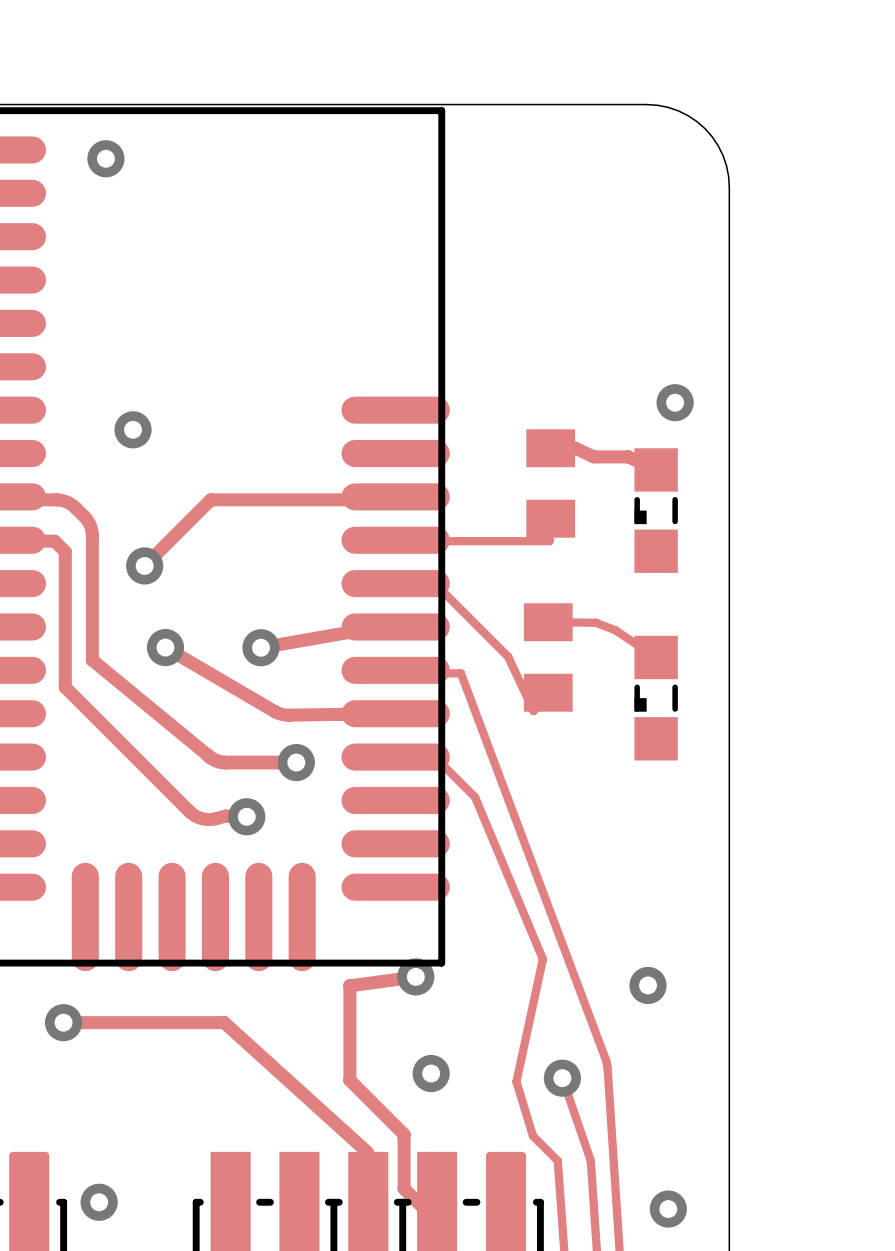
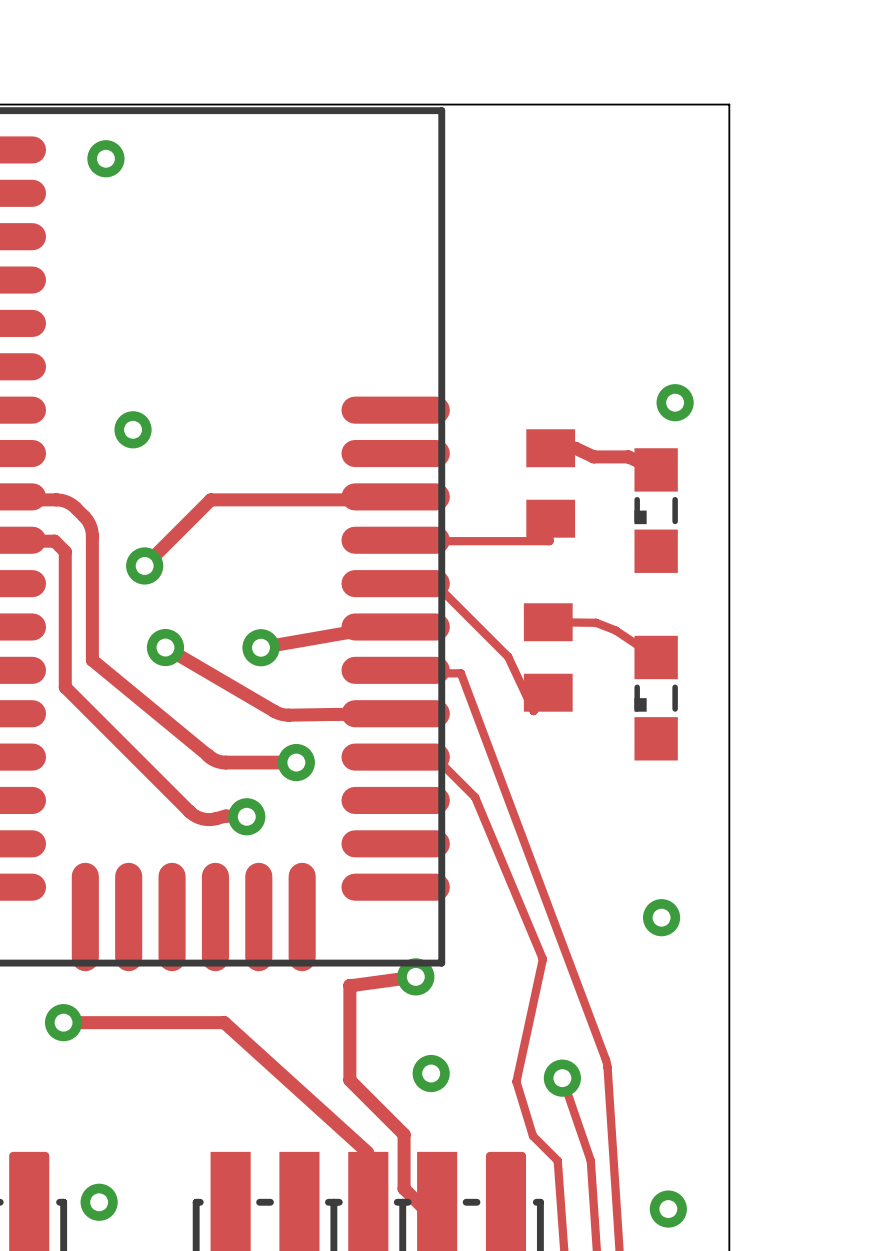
board edge: (646, 104) (678, 110) (705, 128) (723, 155) (729, 187) -> (646, 104) (729, 104) (729, 187)
via position: (648, 985) -> (661, 917)

